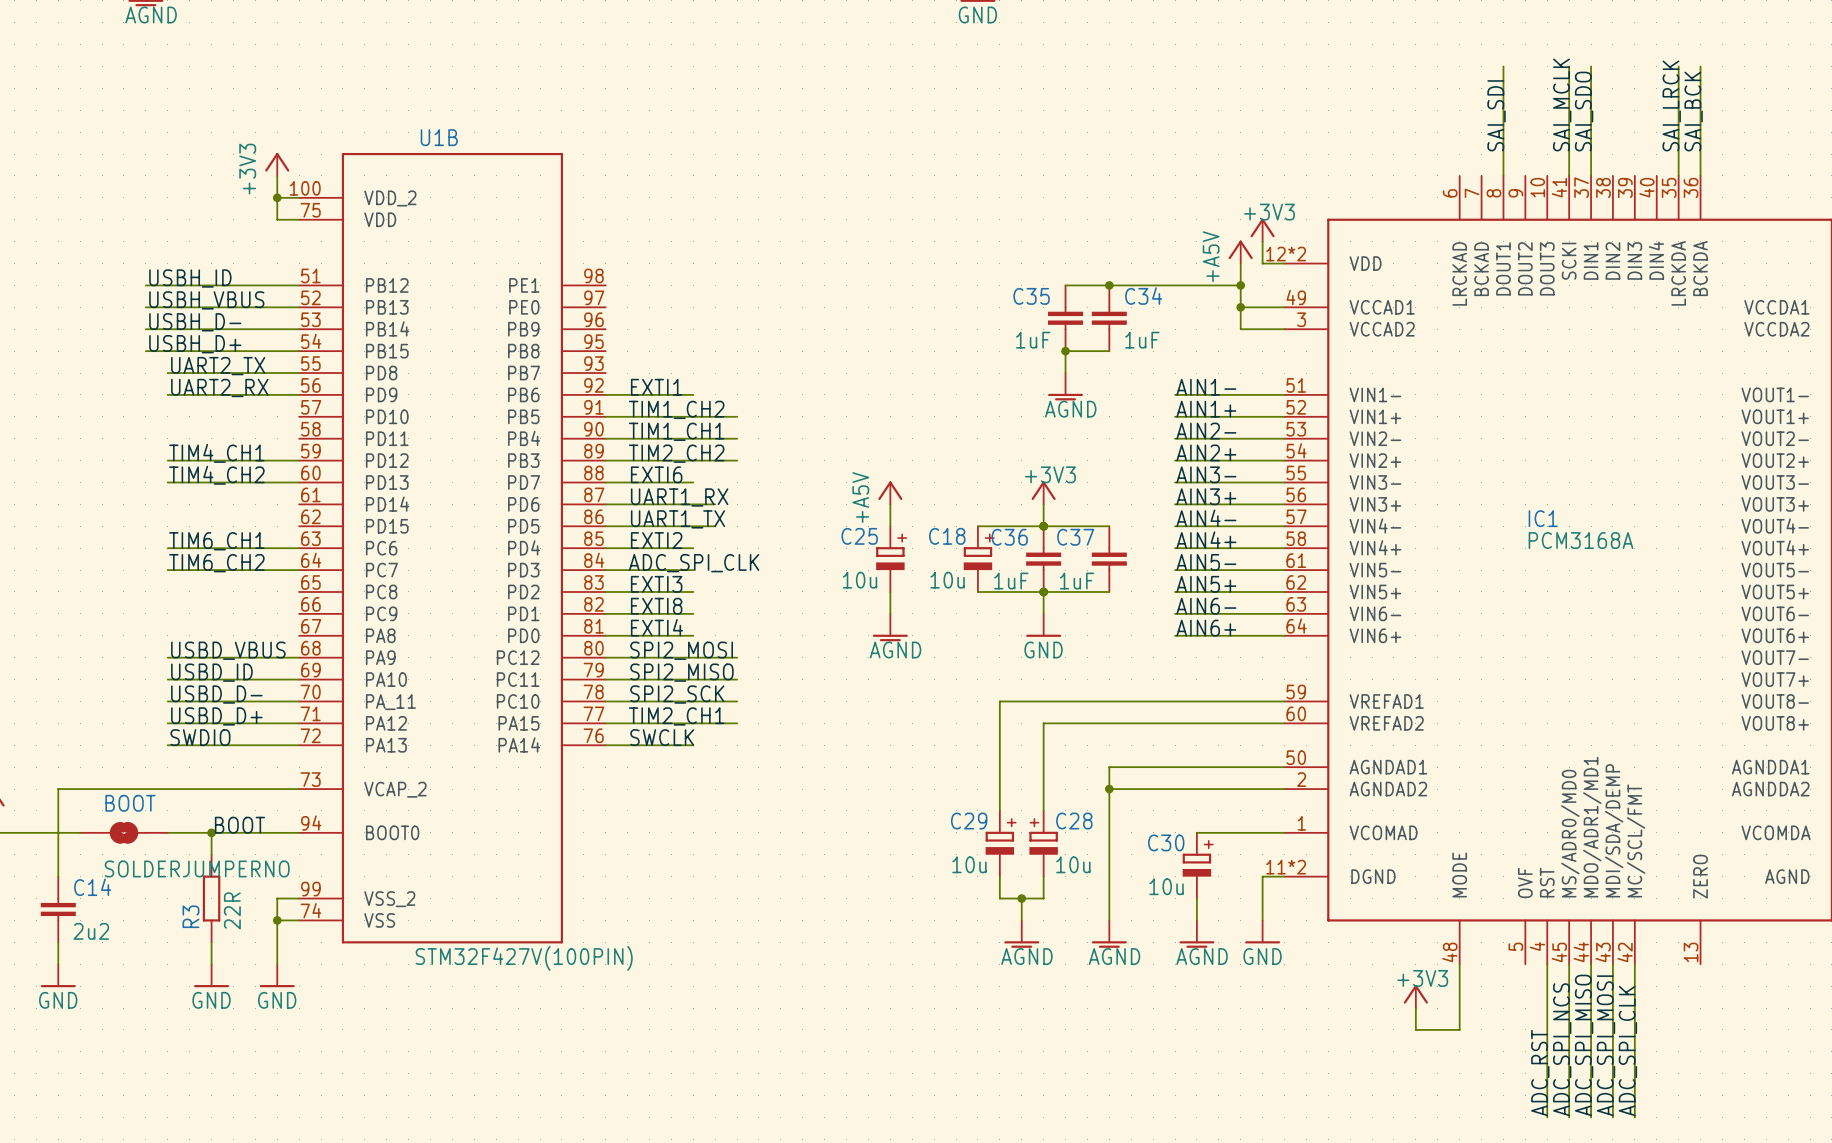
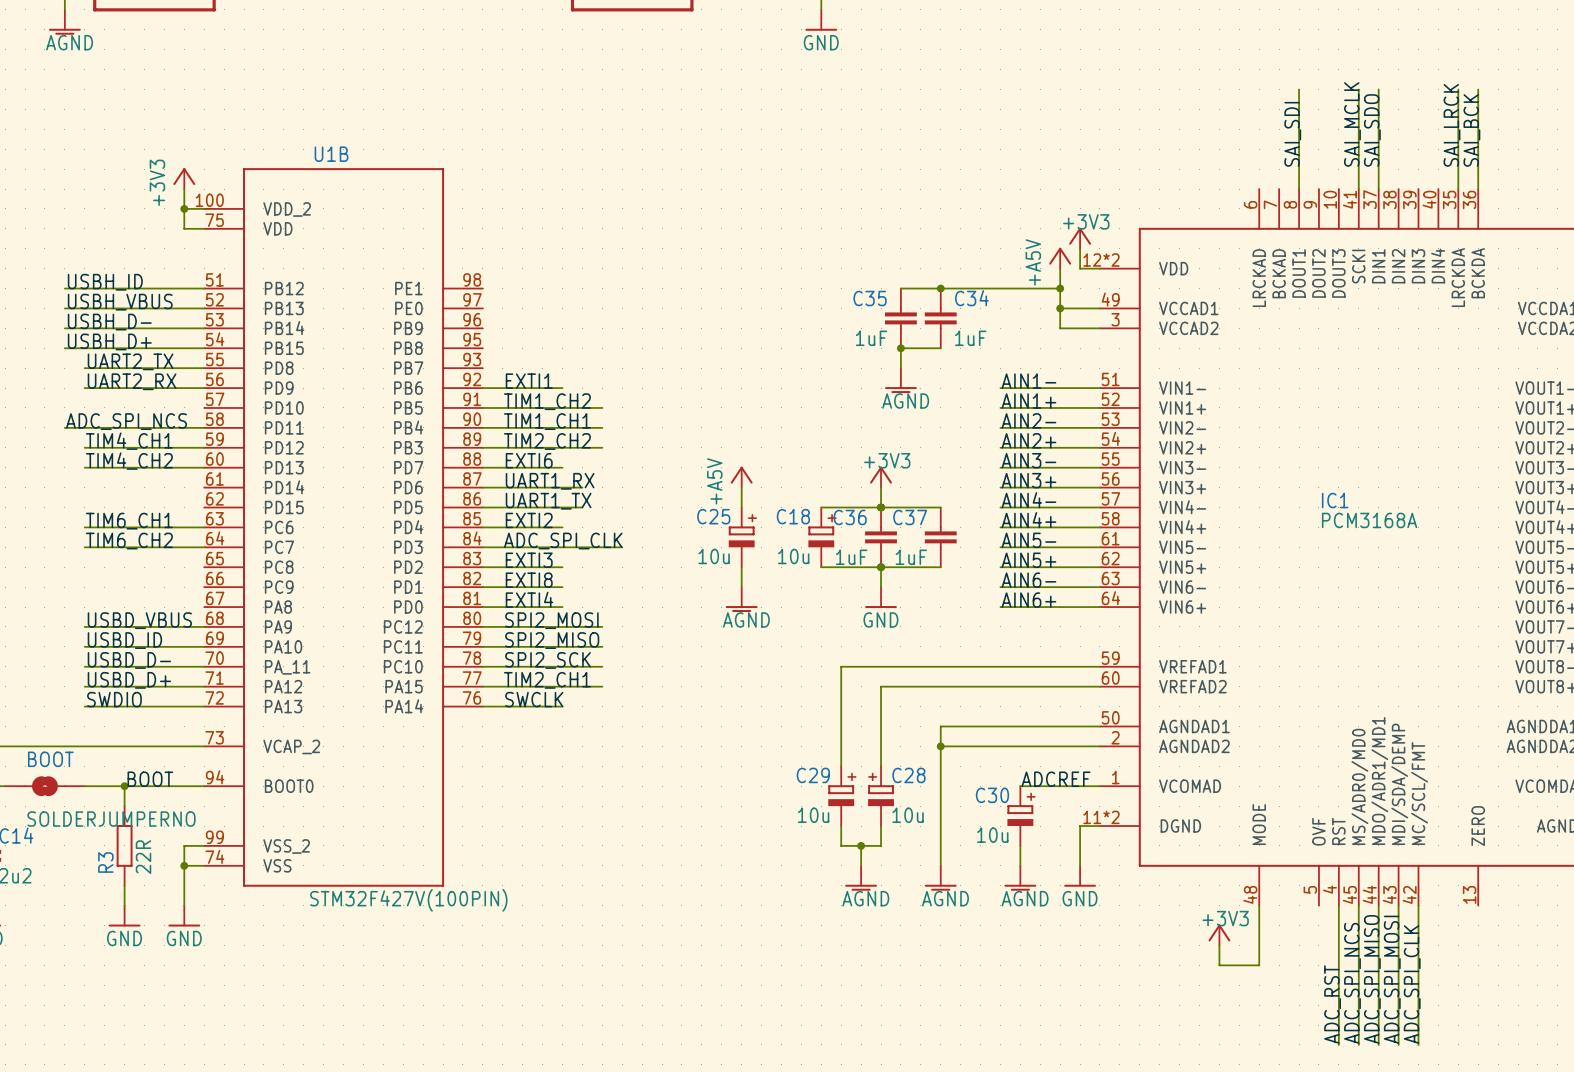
label: none -> ADC_SPI_NCS (126, 421)
wire: none -> (64, 427) (204, 427)
wire: none -> (562, 547) (622, 547)
label: none -> ADCREF (1056, 779)

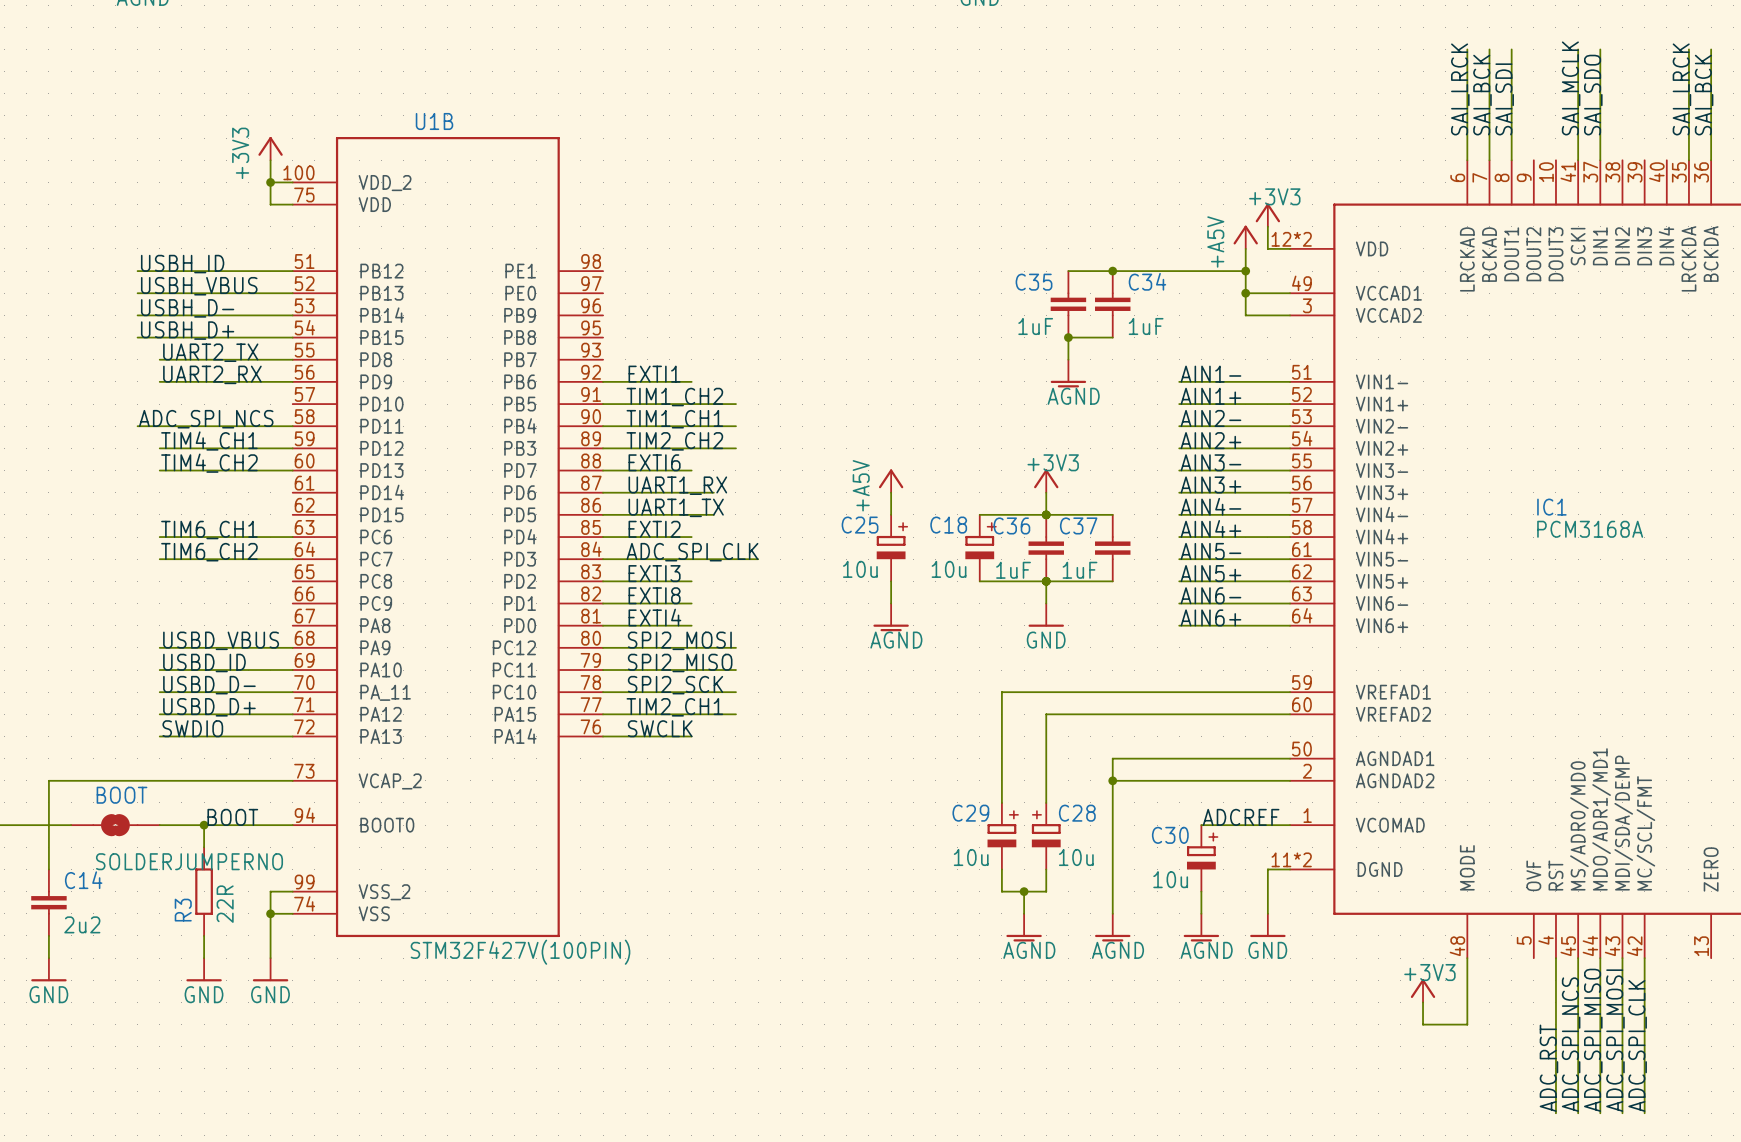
wire: none -> (1467, 49) (1467, 160)
wire: none -> (1489, 49) (1489, 160)
label: none -> SAI_LRCK (1460, 89)
label: none -> SAI_BCK (1482, 95)

